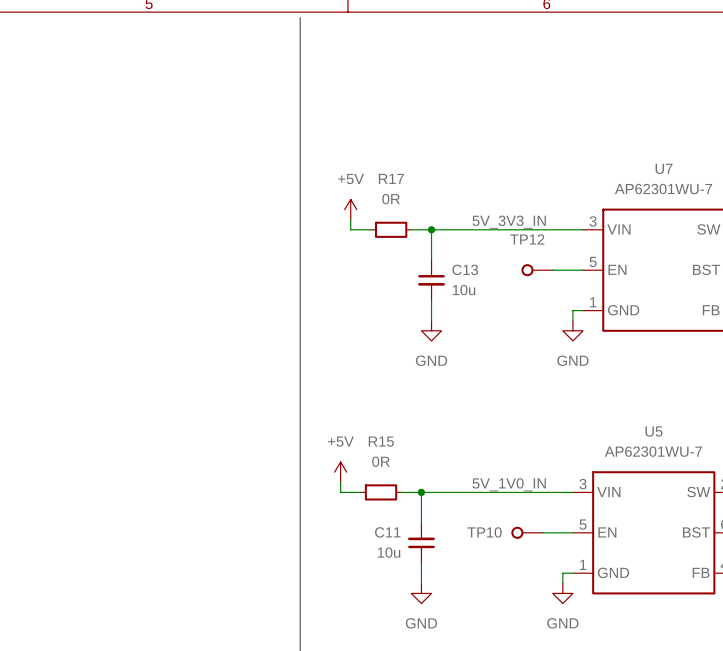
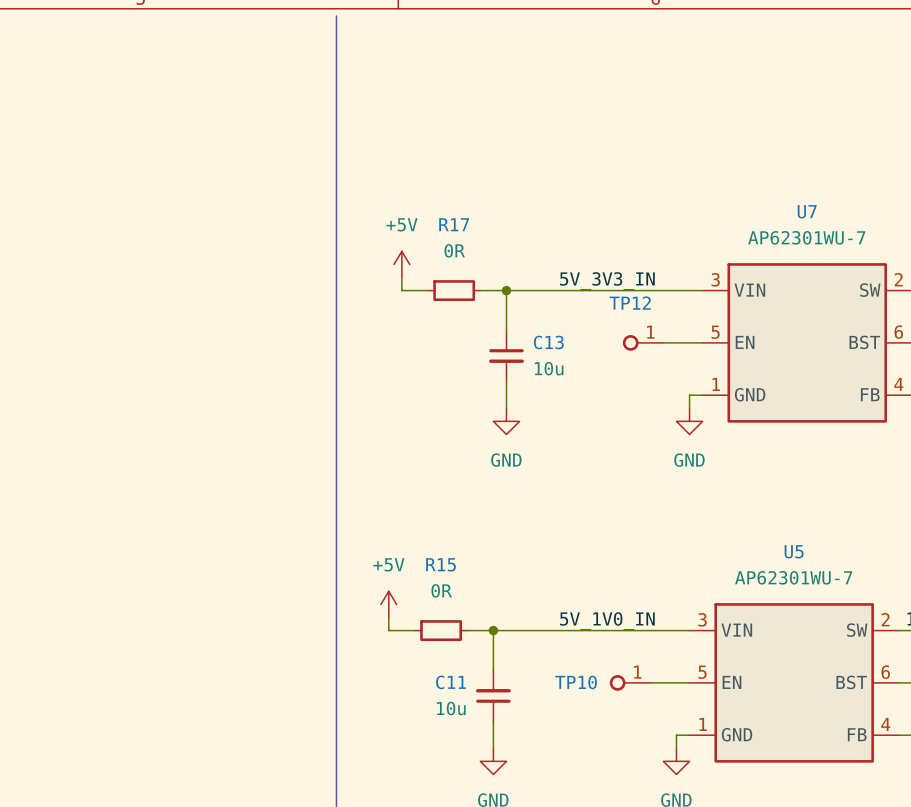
TP12 pin number: none -> 1 (650, 332)
TP10 pin number: none -> 1 (637, 672)

